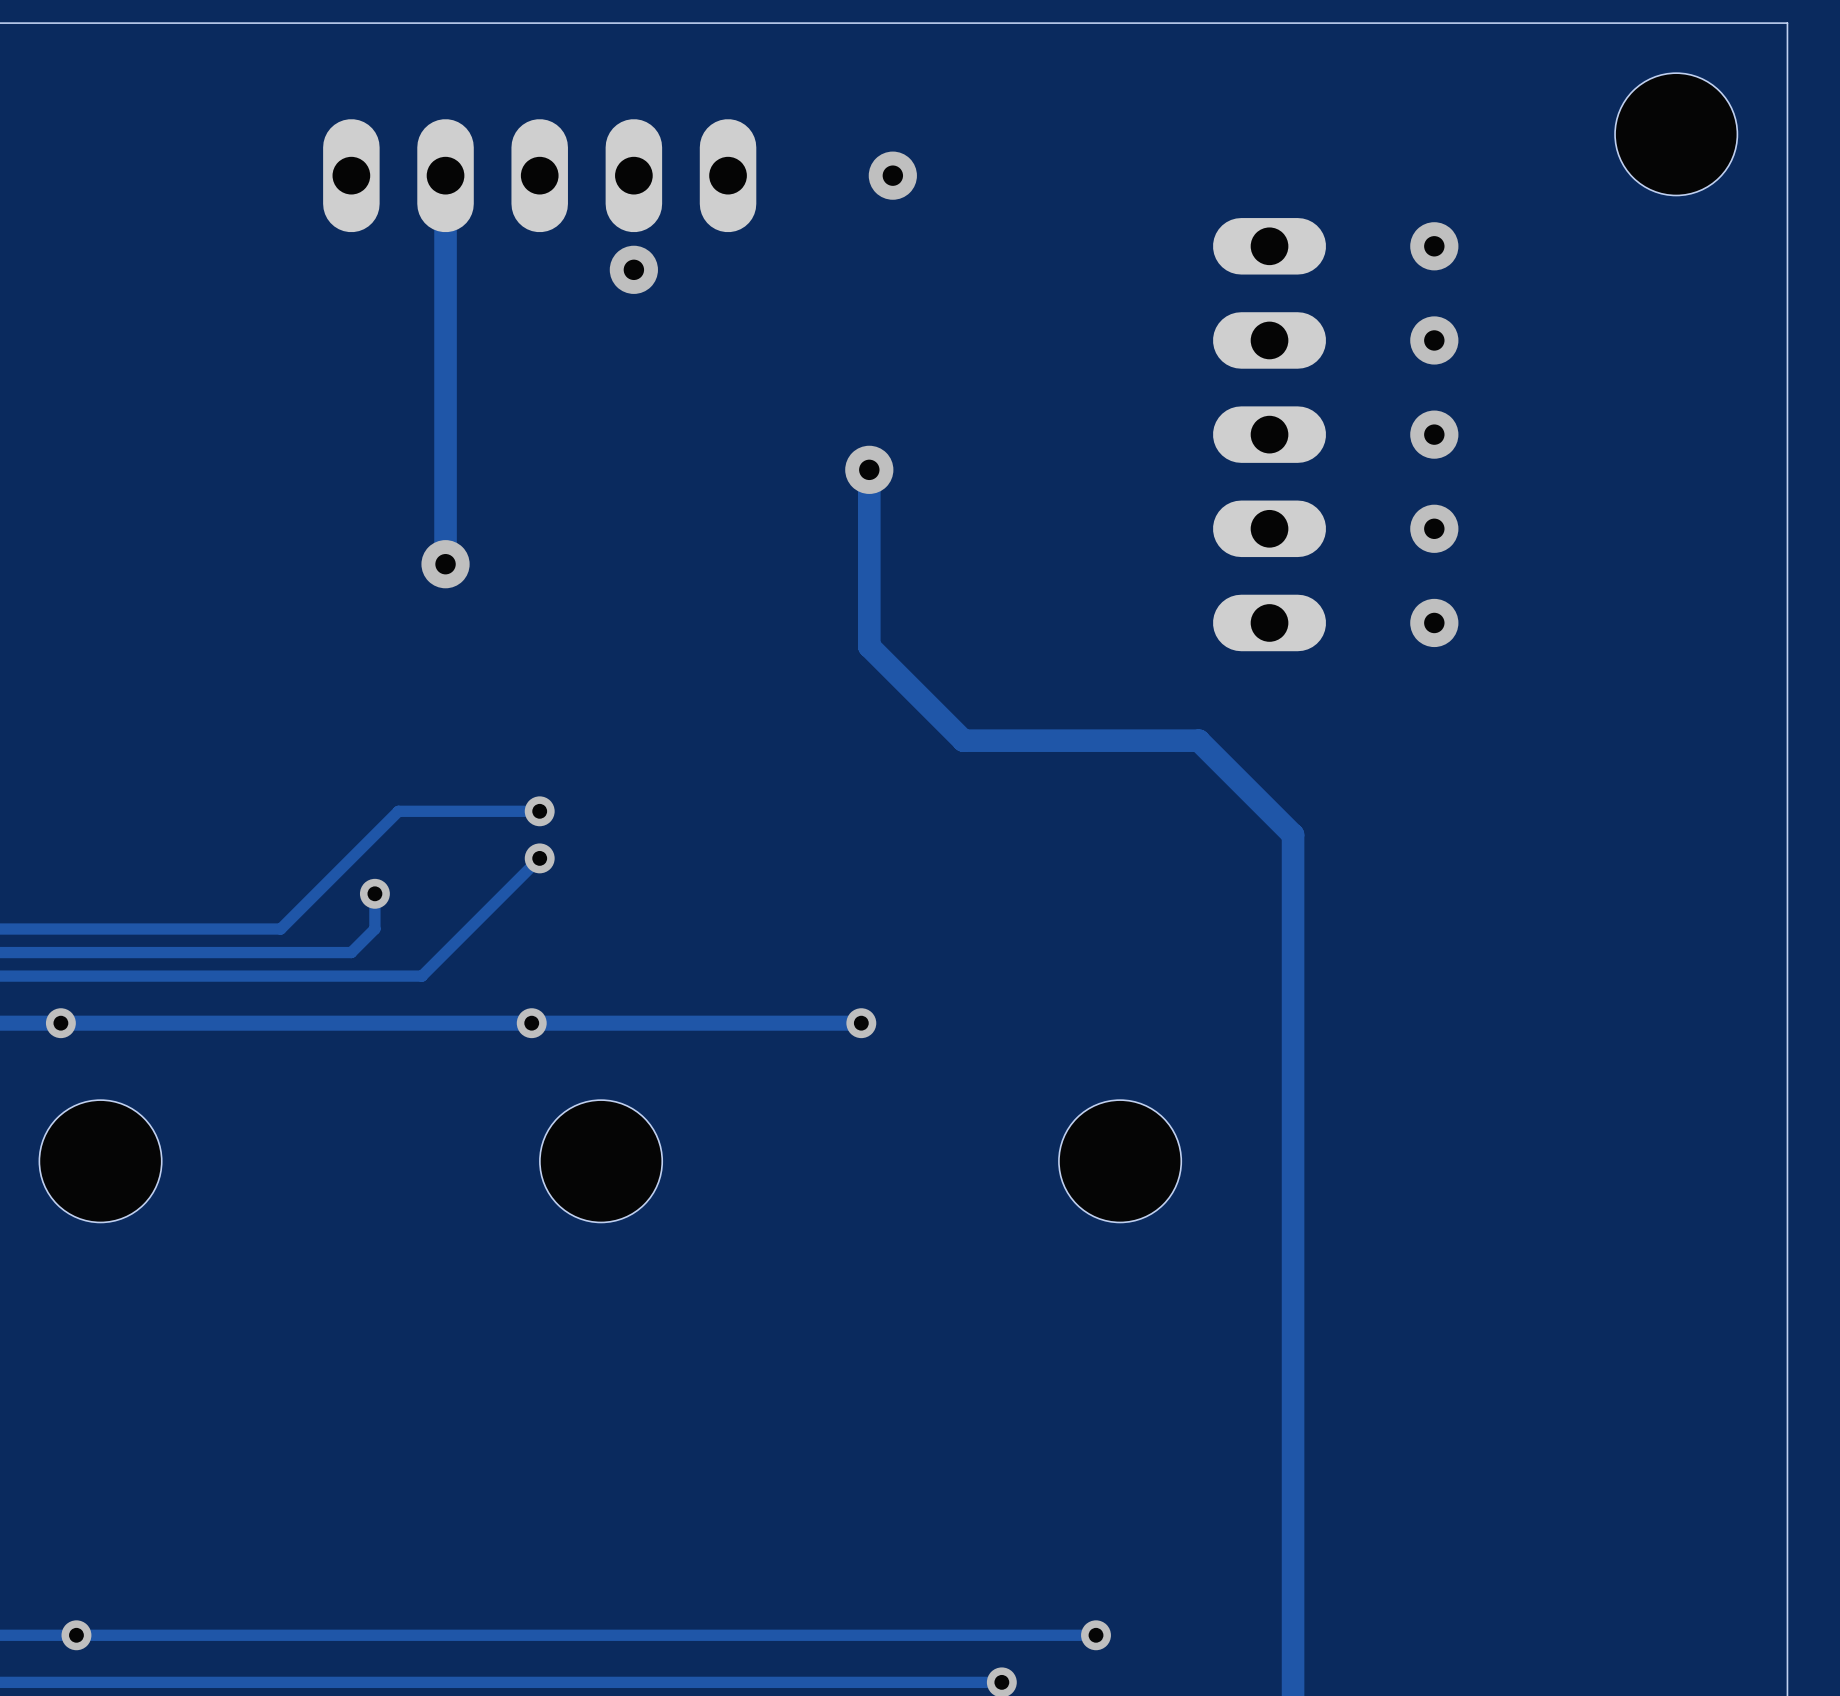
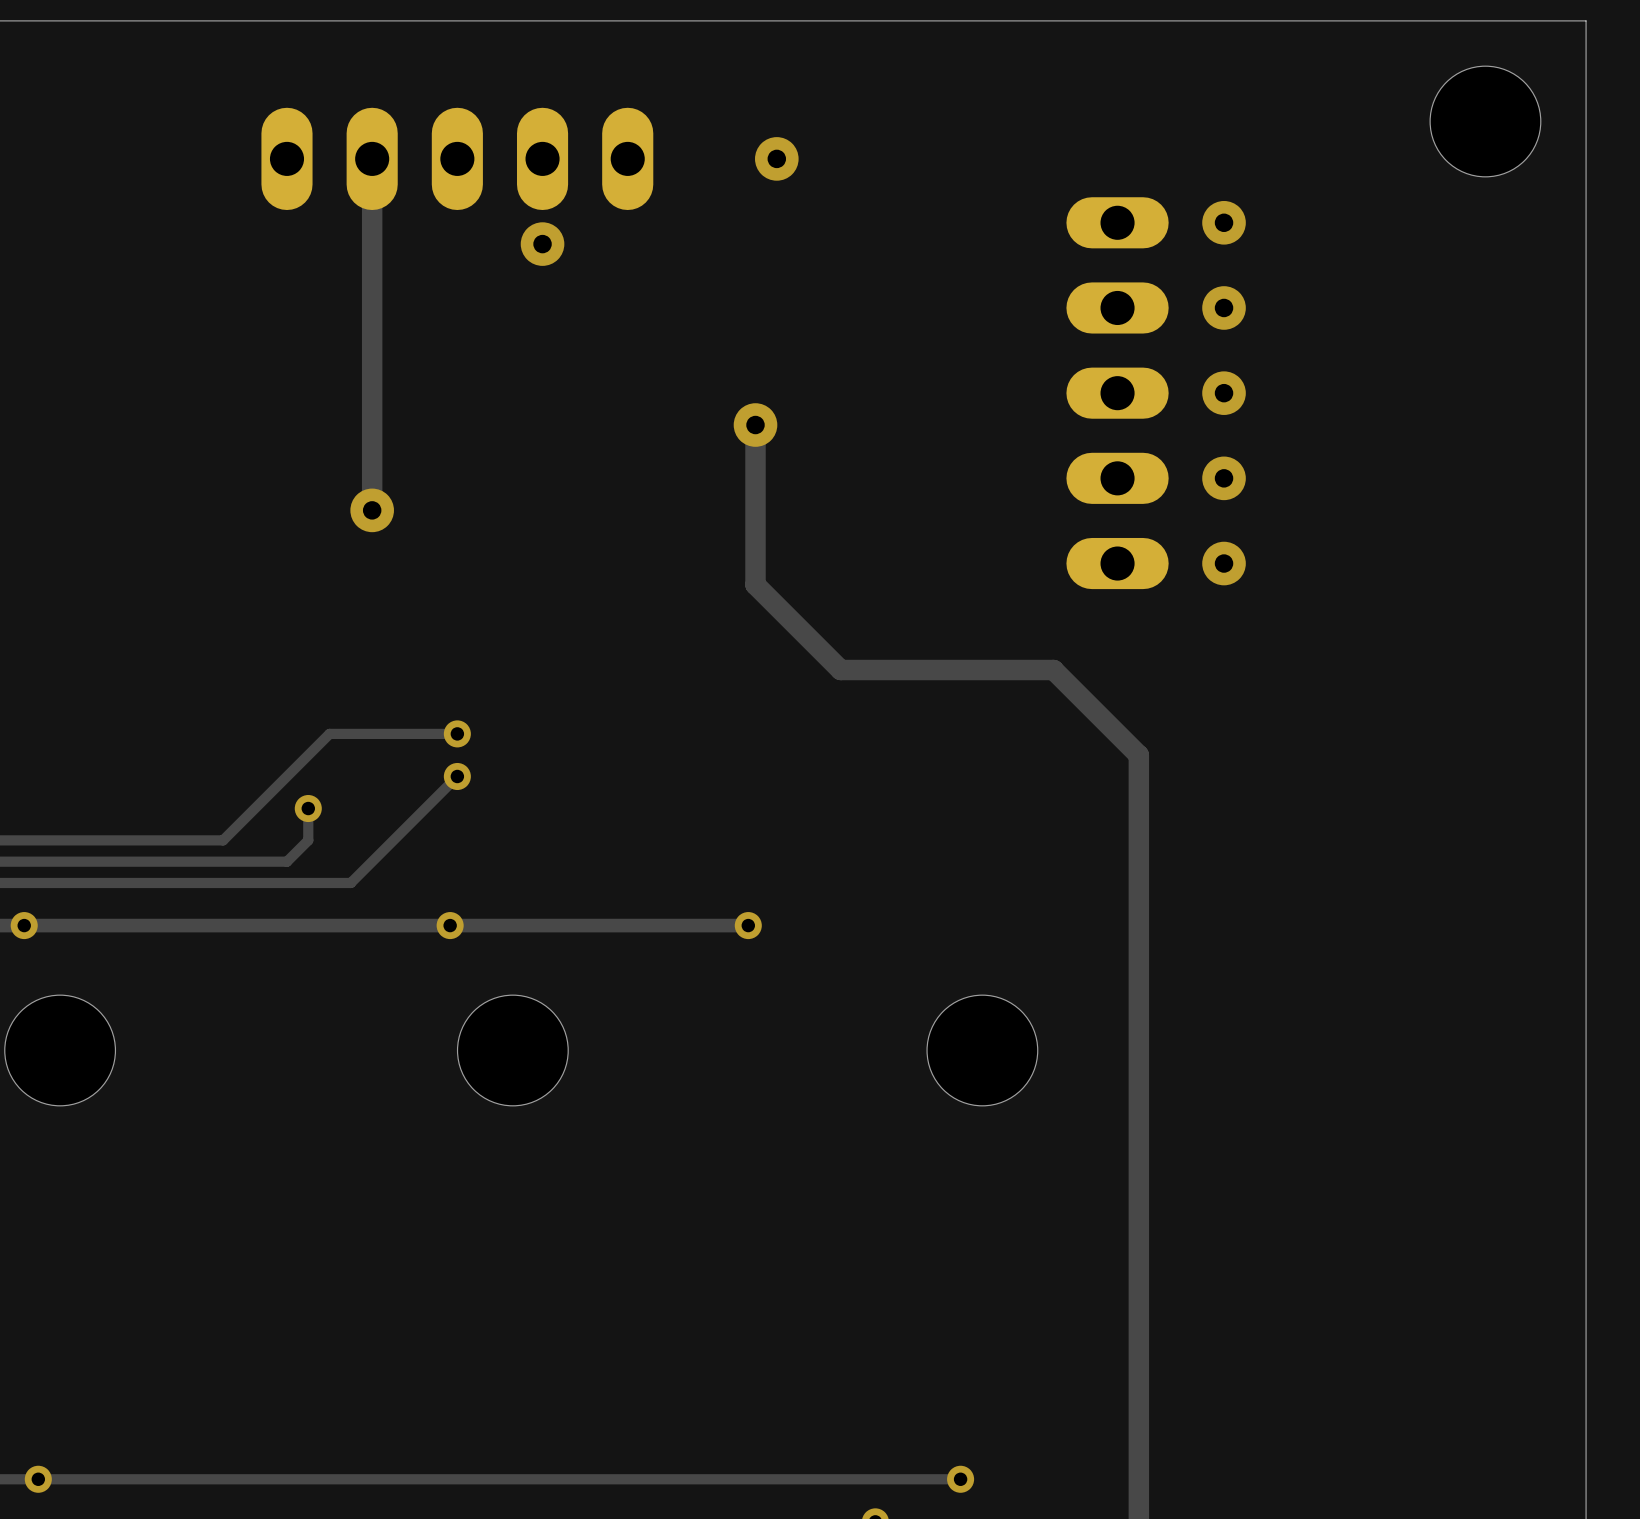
via position: (1434, 246) -> (1224, 222)
via position: (1434, 340) -> (1224, 307)
via position: (1434, 434) -> (1224, 393)
via position: (1434, 528) -> (1224, 478)
via position: (1434, 622) -> (1224, 563)

